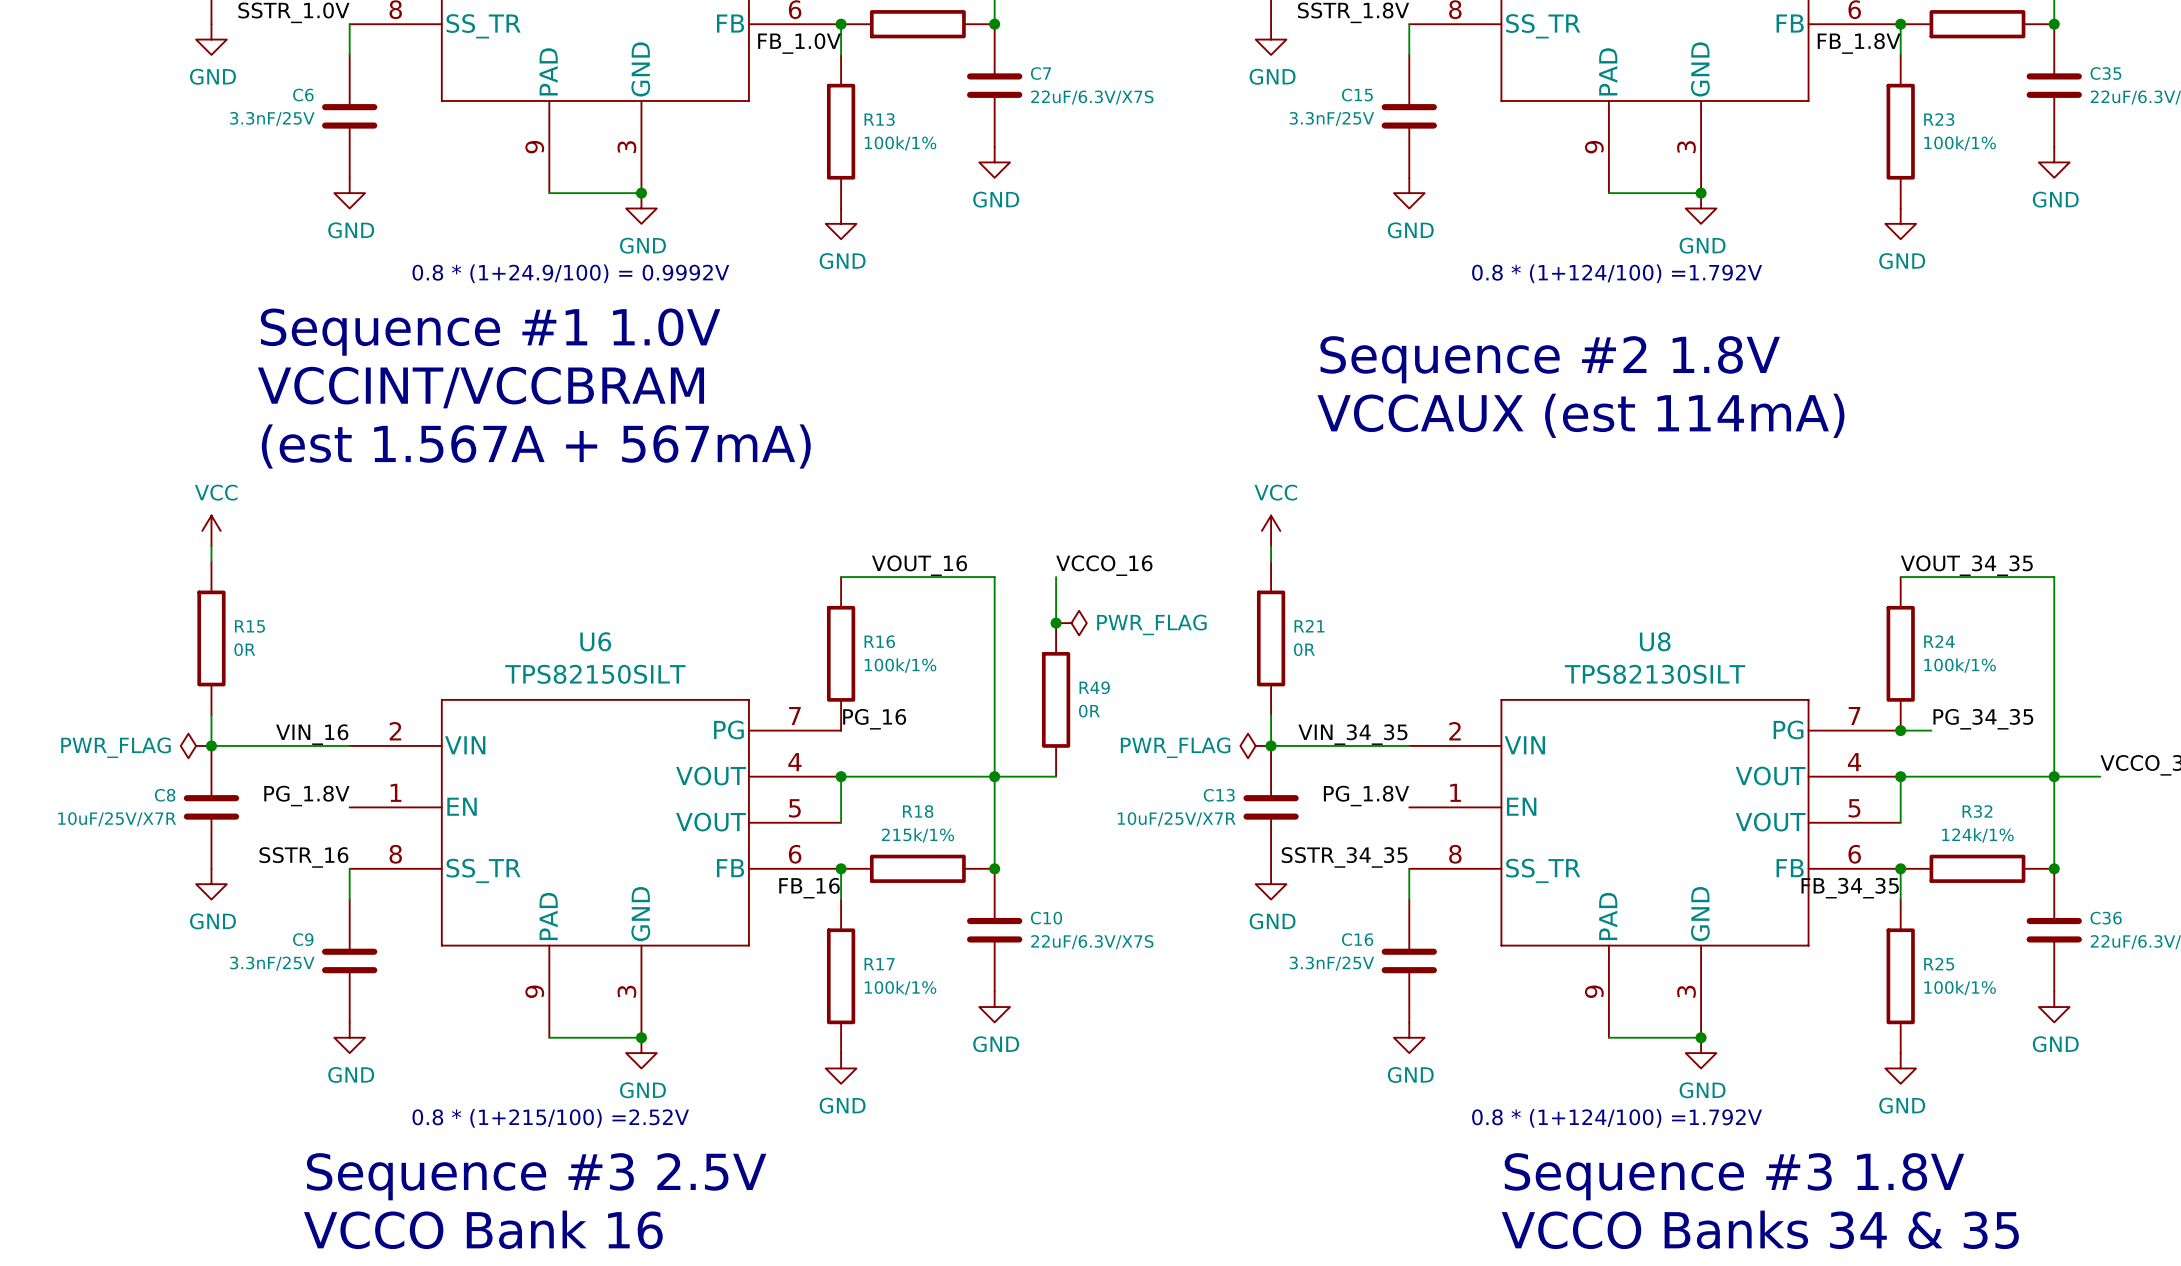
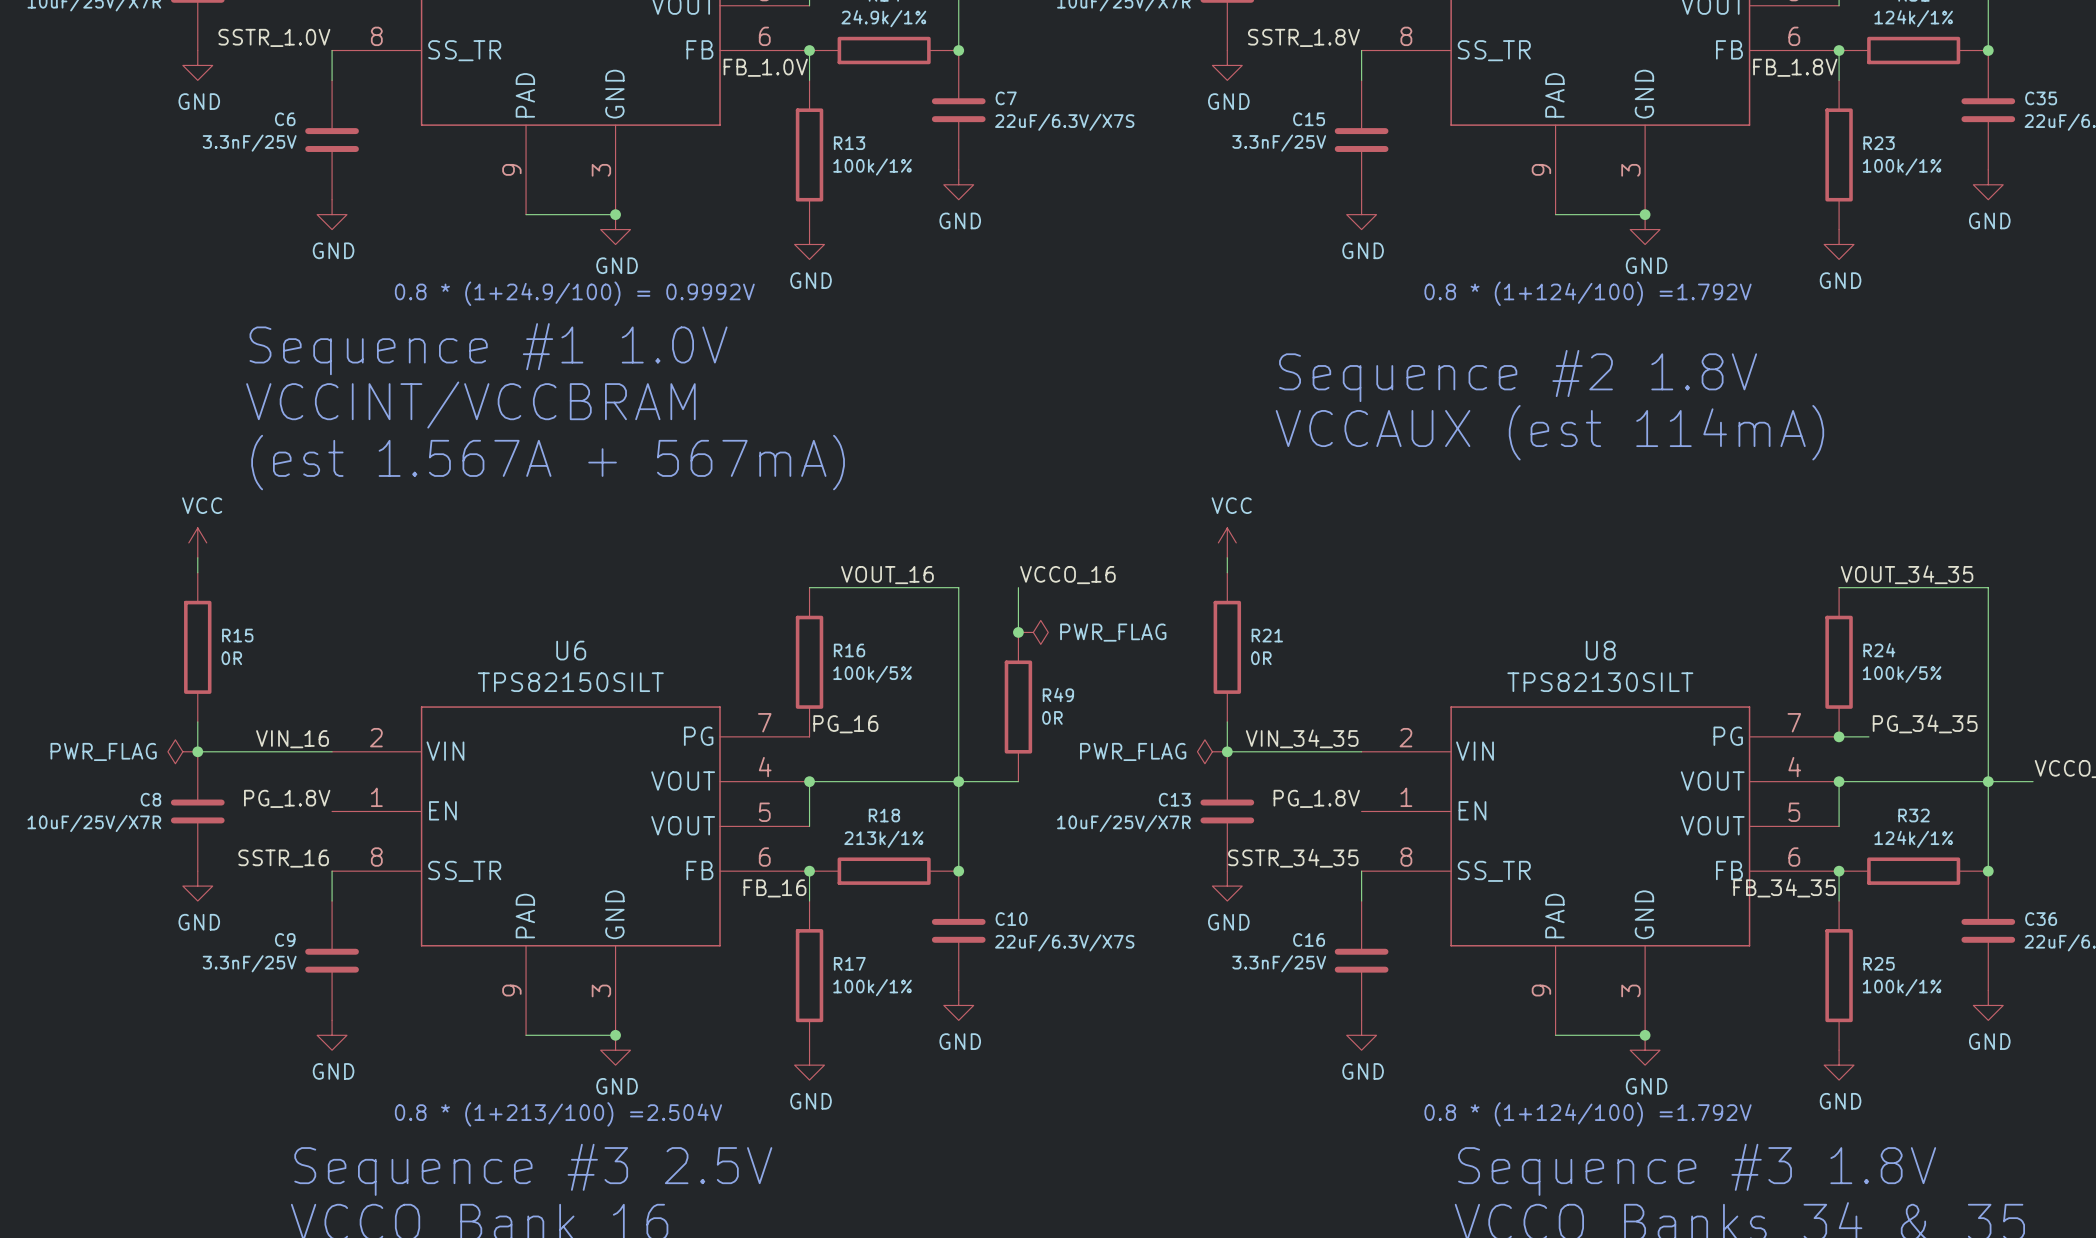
R16 value: 100k/1% (900, 665) -> 100k/5% (872, 674)
R24 value: 100k/1% (1960, 665) -> 100k/5% (1902, 674)
R18 value: 215k/1% (918, 835) -> 213k/1% (883, 839)
text: 0.8 * (1+215/100) =2.52V (550, 1118) -> 0.8 * (1+213/100) =2.504V (558, 1114)

